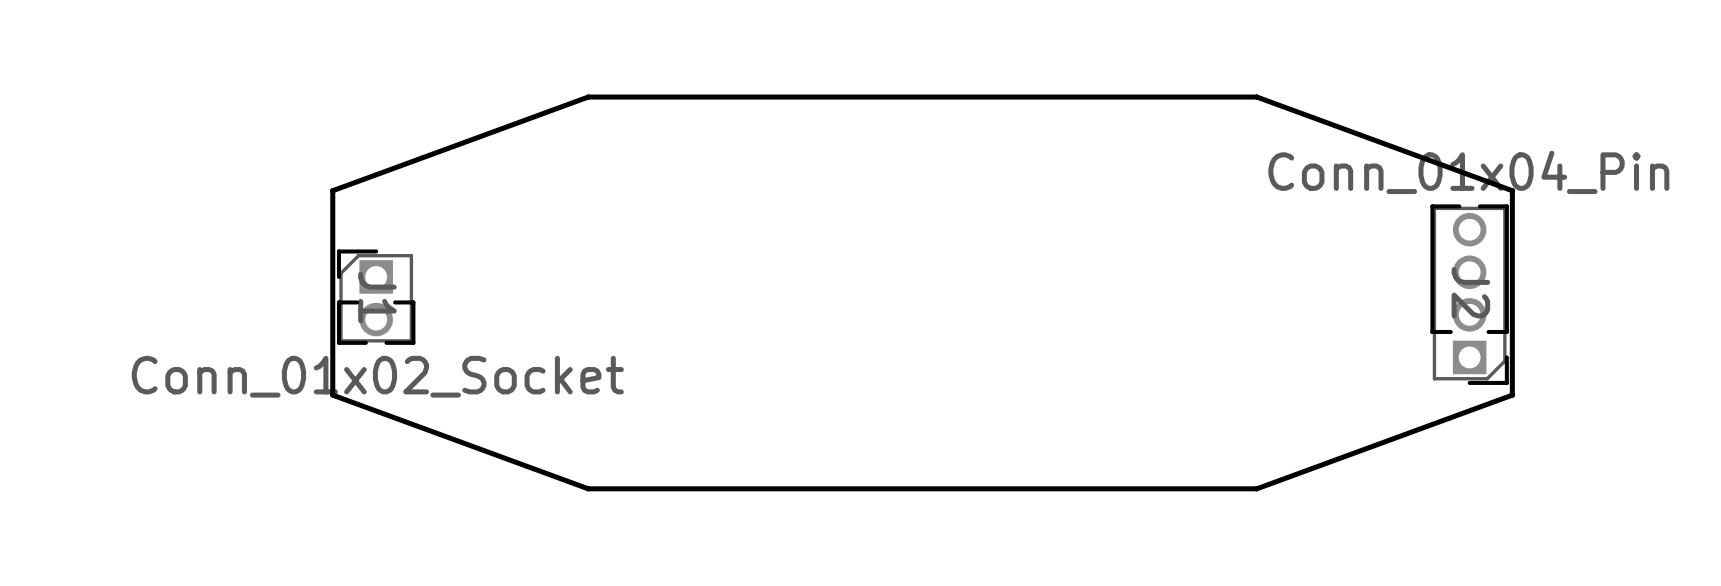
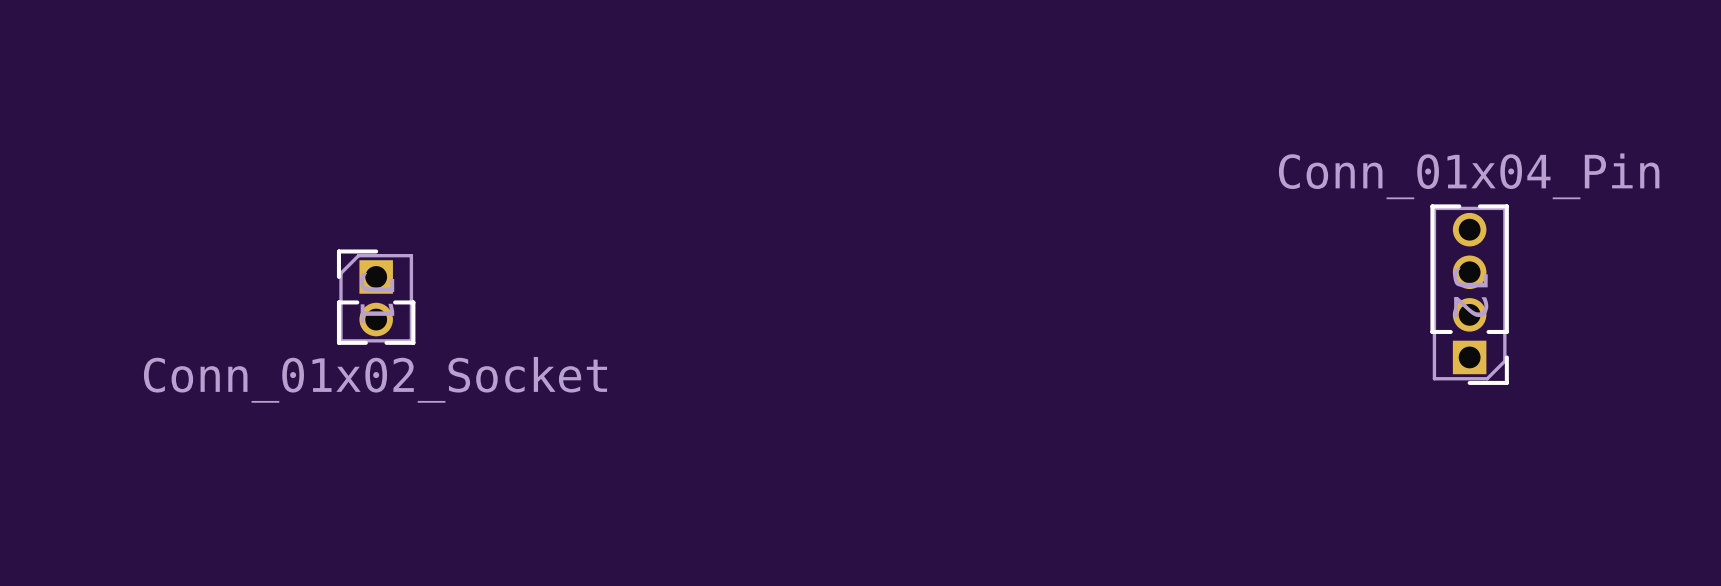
board edge: (1256, 97) (1512, 190) (1512, 395) (1256, 488) (588, 488) (332, 395) (332, 190) (588, 97) (1256, 97) -> none

